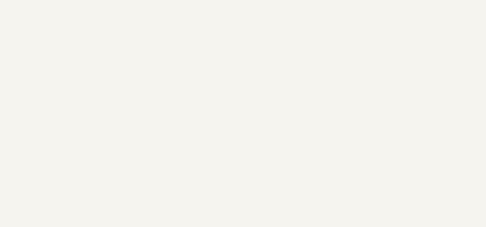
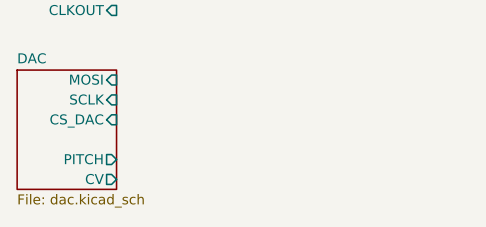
sheet pin: none -> CLKOUT (76, 10)
sheet pin: none -> MOSI (86, 79)
sheet pin: none -> SCLK (87, 99)
sheet pin: none -> CS_DAC (76, 120)
sheet DAC: none -> File: dac.kicad_sch (66, 129)
sheet pin: none -> PITCH (83, 159)
sheet pin: none -> CV (94, 179)

